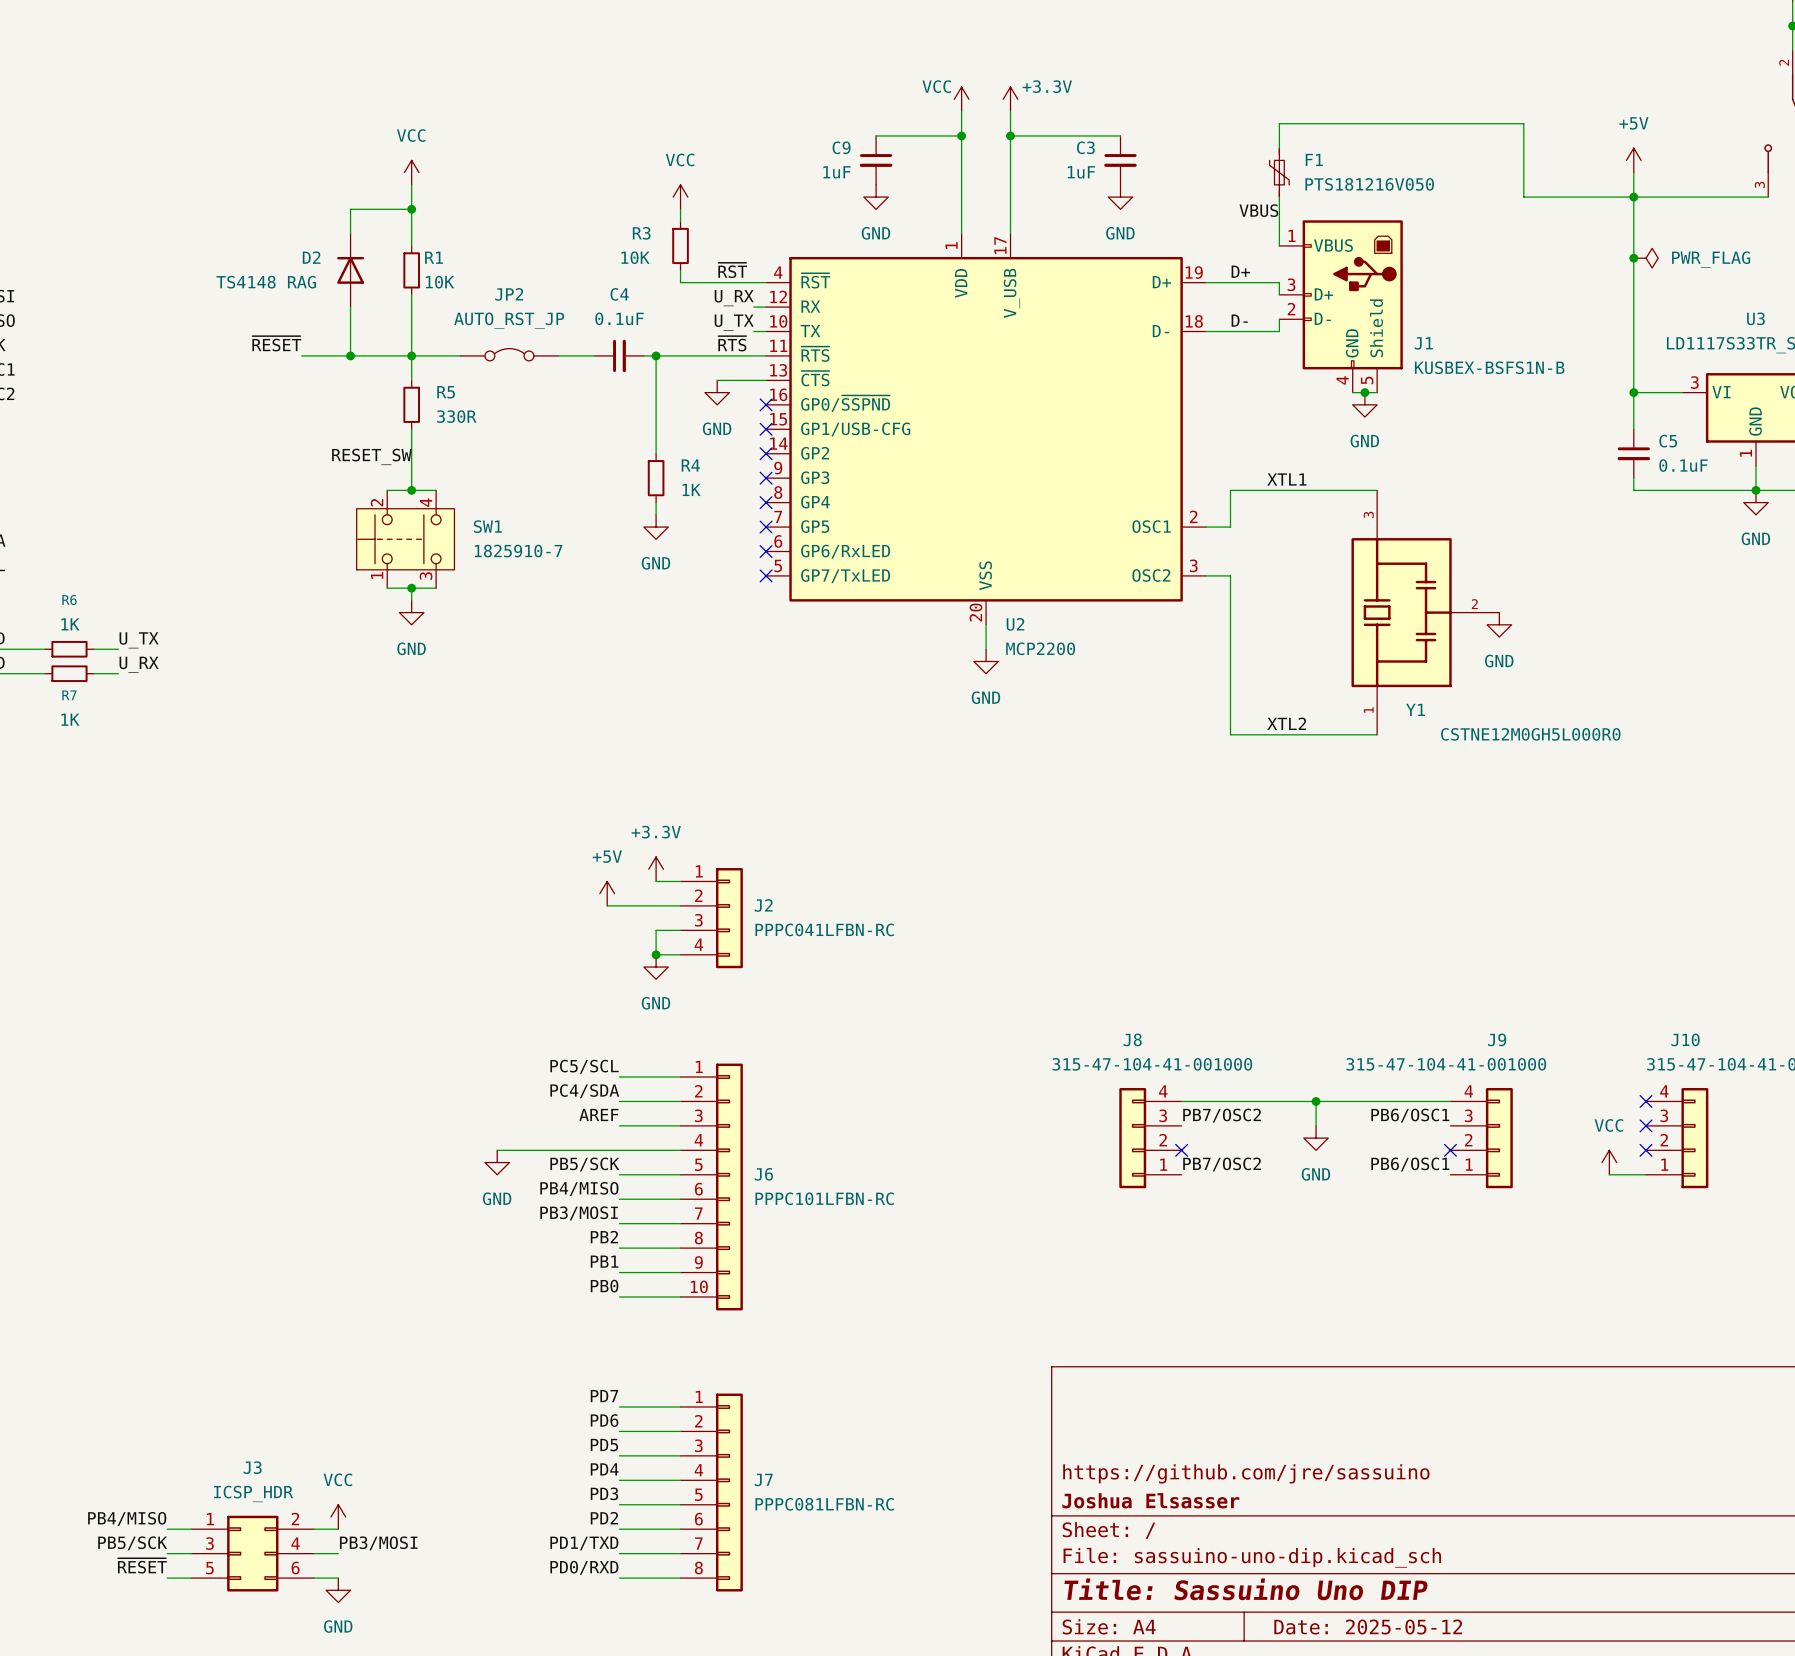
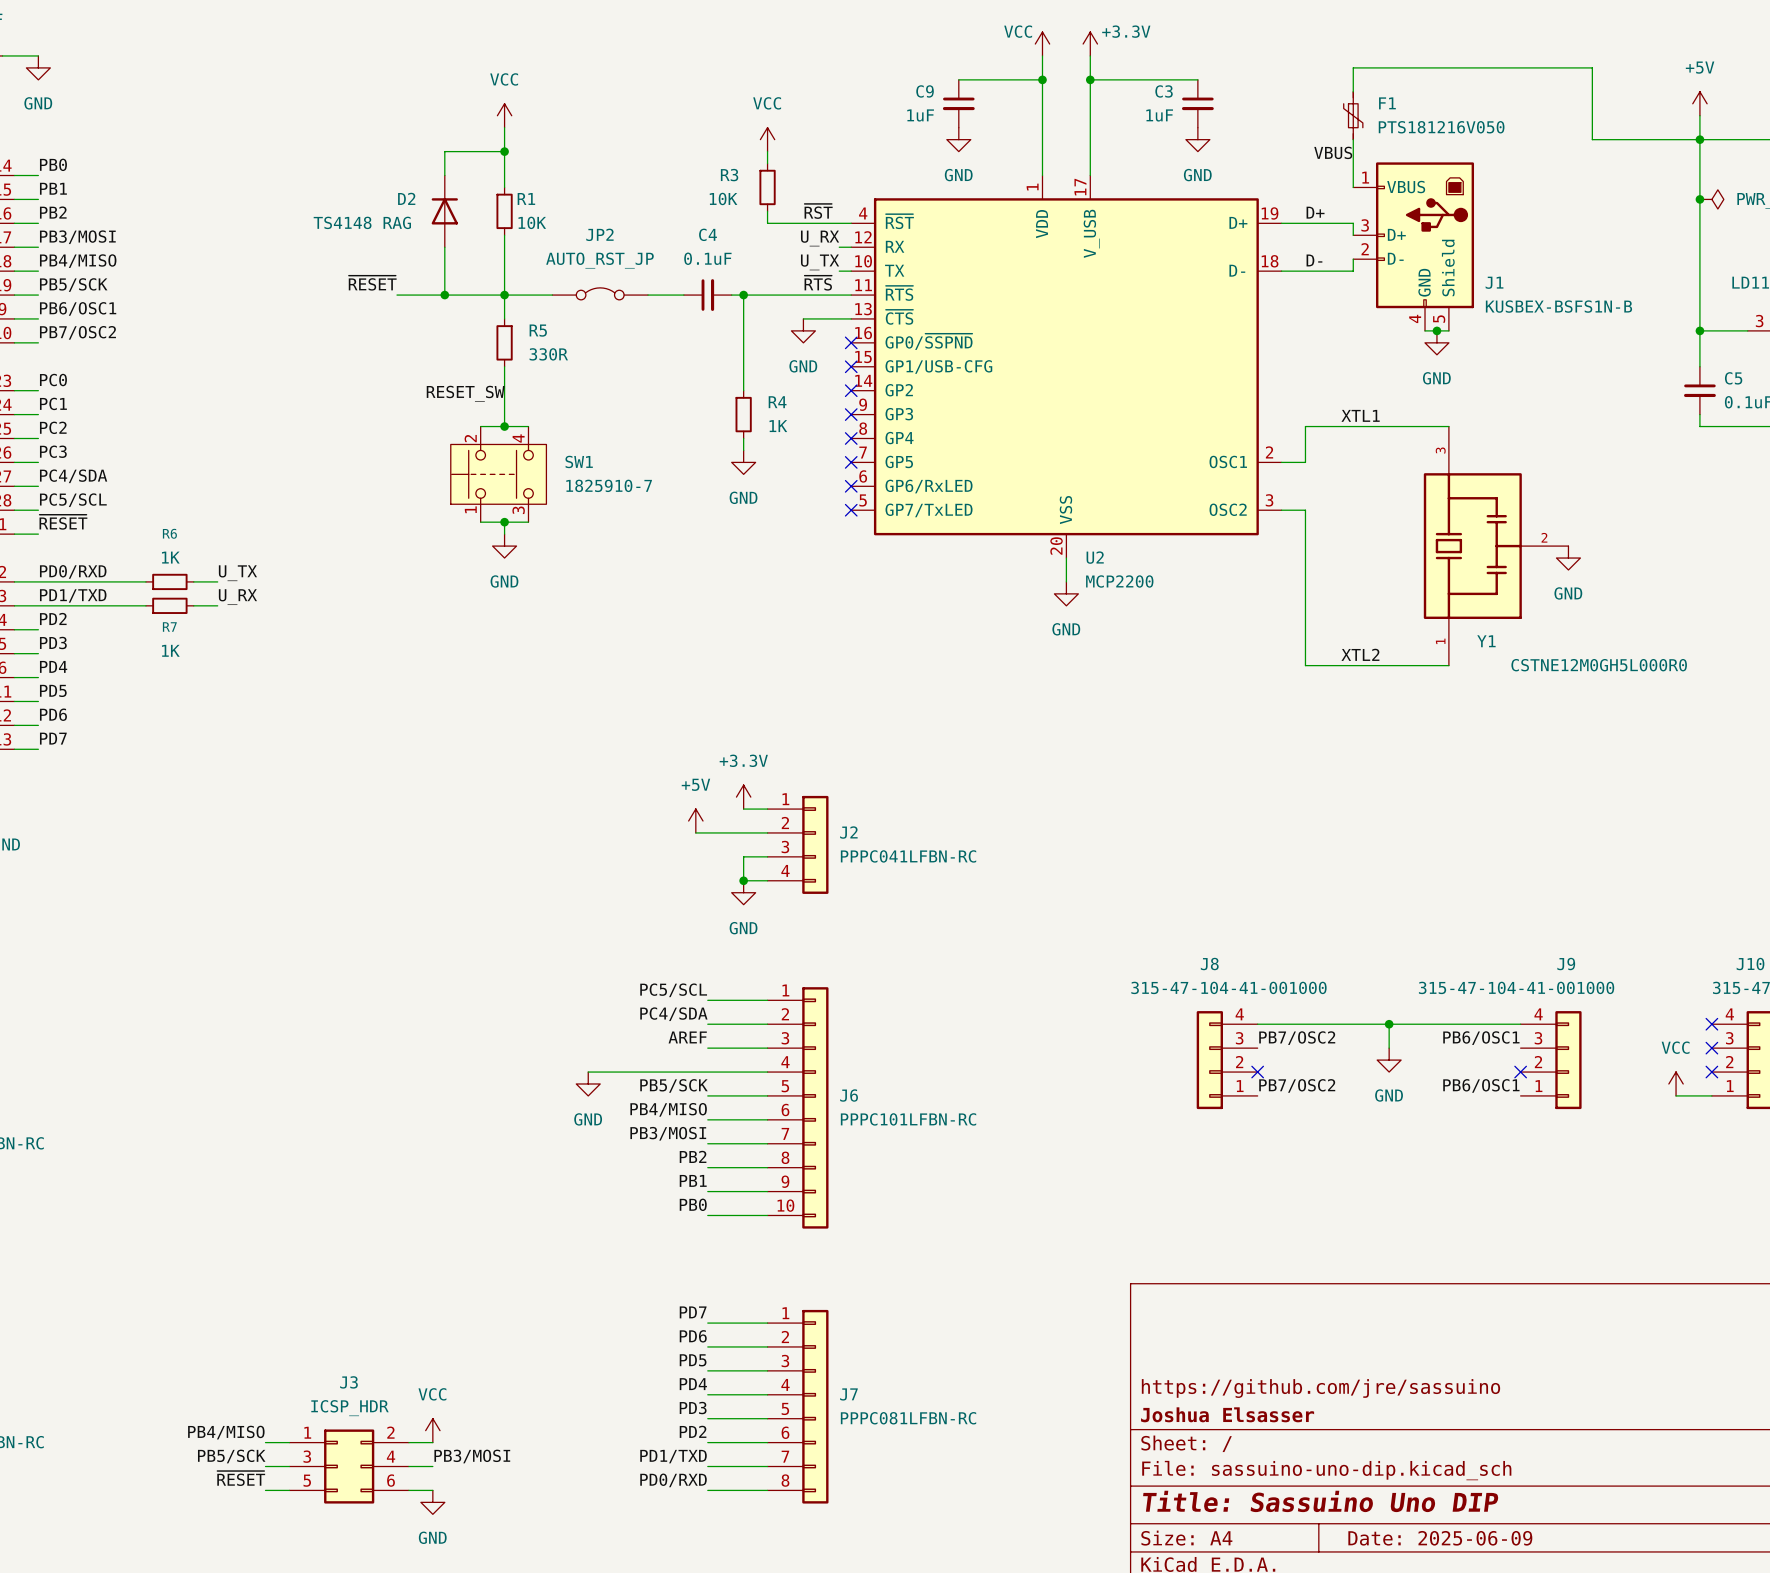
title block: Date: 2025-05-12 (1368, 1627) -> Date: 2025-06-09 (1440, 1538)

